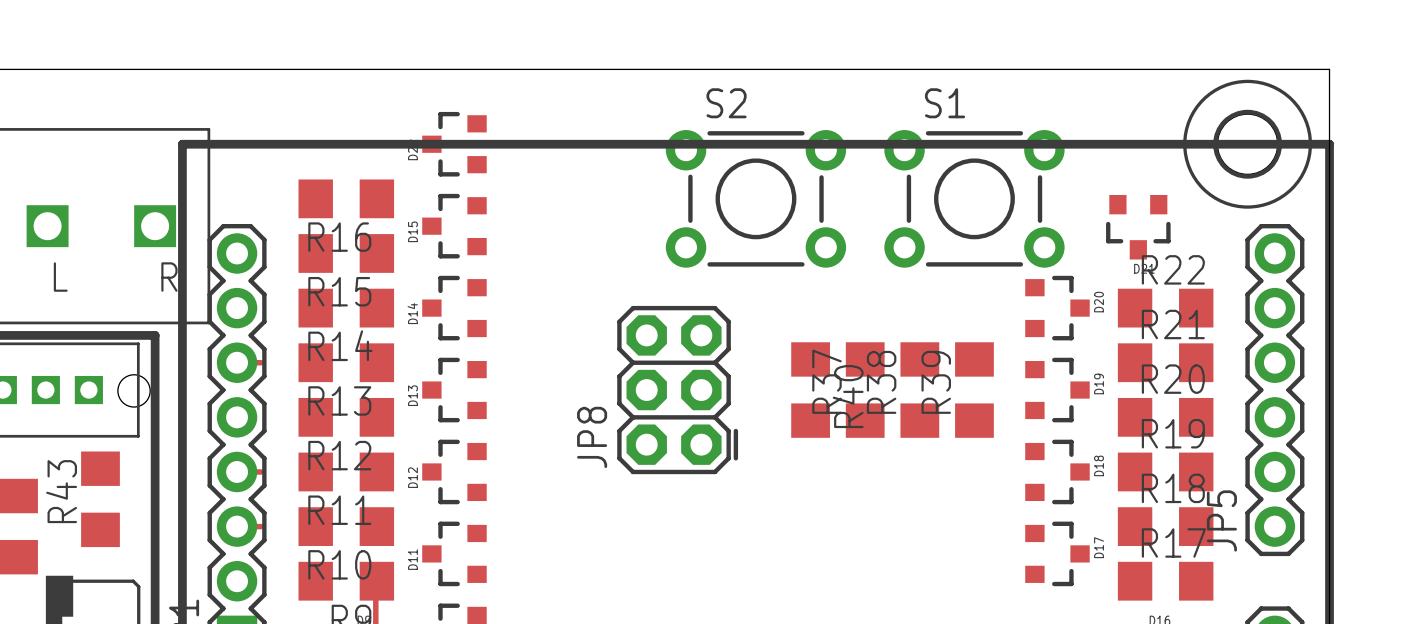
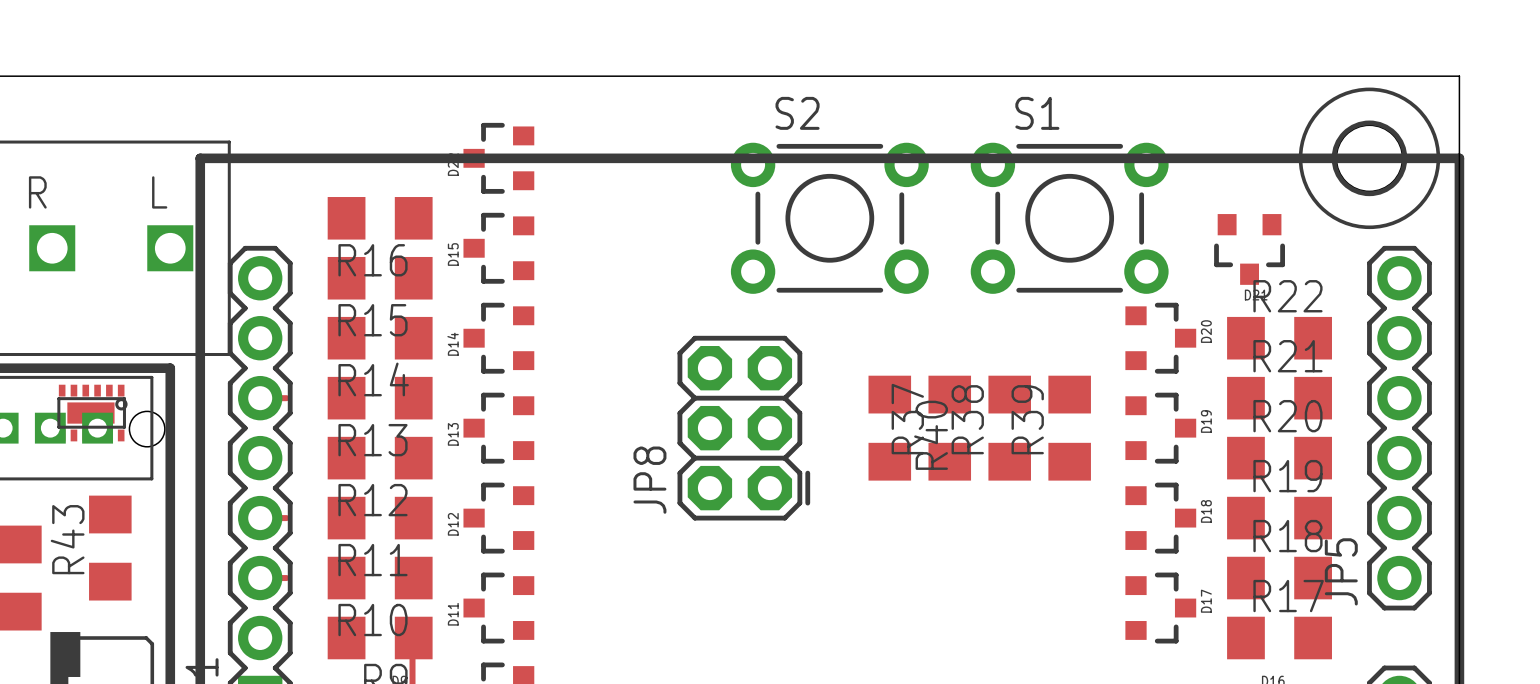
part text position: L (60, 277) -> L (159, 192)
part text position: R (169, 277) -> R (37, 192)
part: none -> (92, 413)

